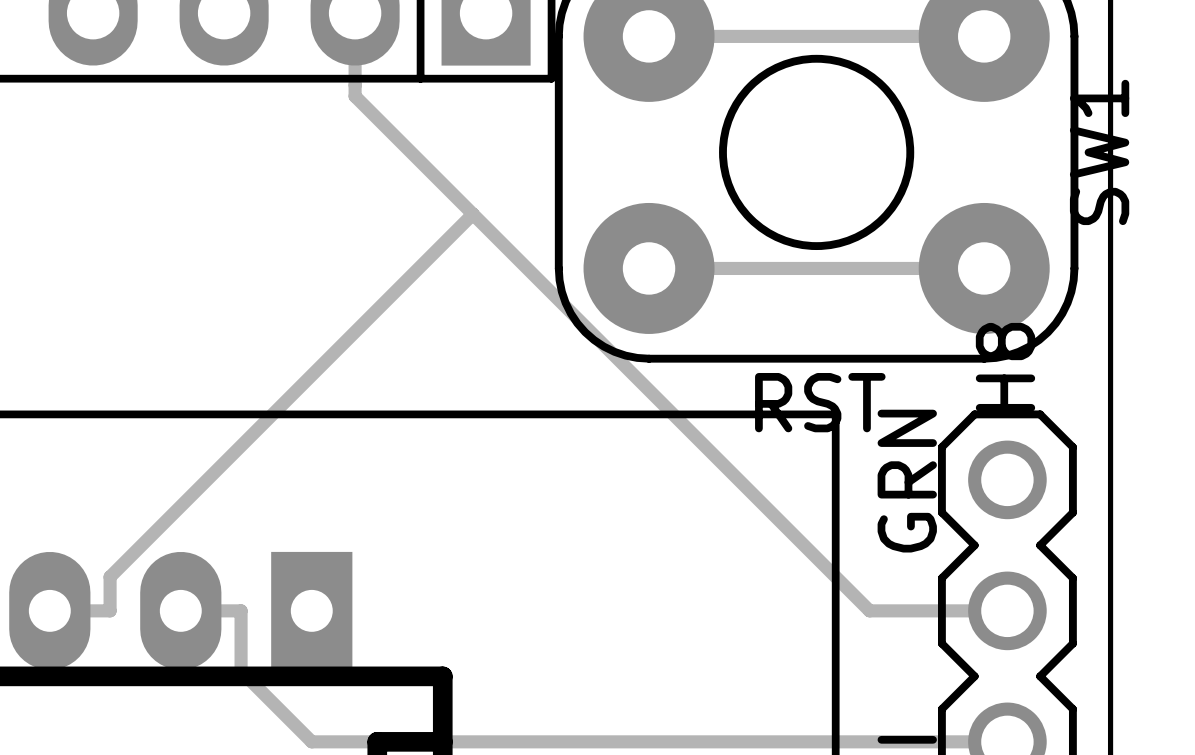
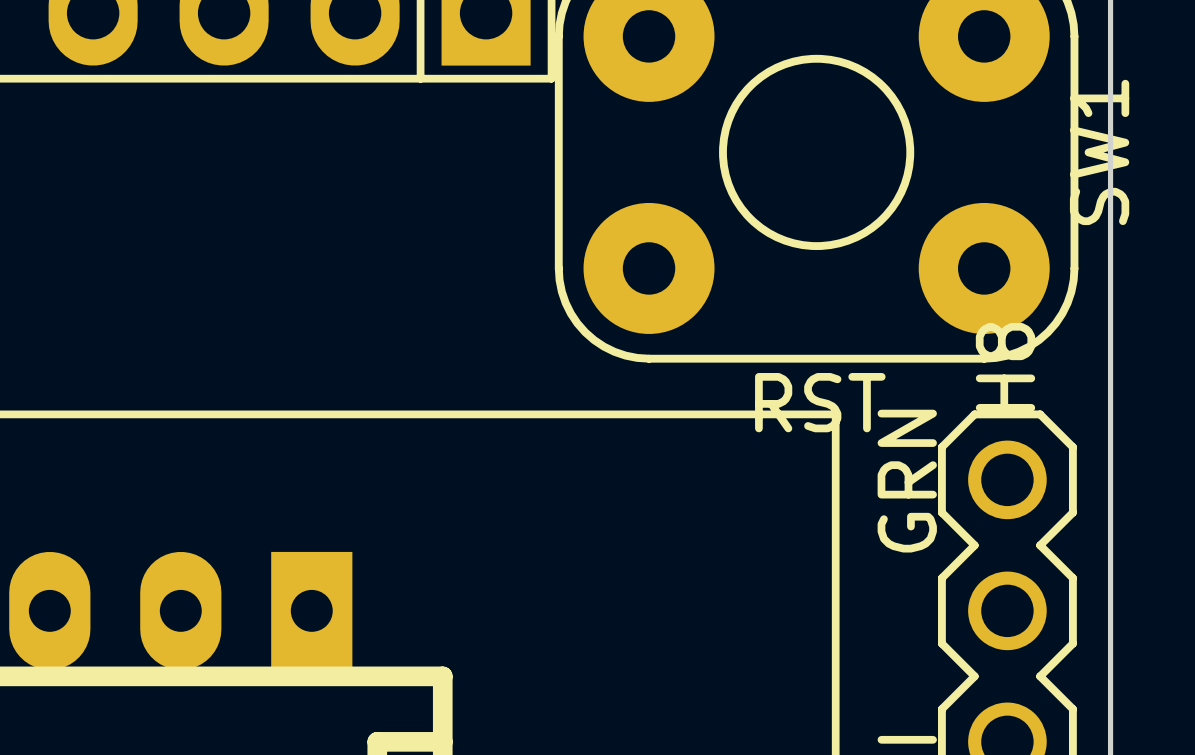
track: (355, 13) (355, 96) (869, 610) (1007, 610) -> none
track: (649, 36) (984, 36) -> none
track: (472, 214) (110, 576) (110, 610) (49, 610) -> none
track: (649, 268) (984, 268) -> none
track: (180, 610) (241, 610) (241, 671) (311, 741) (1007, 741) -> none

